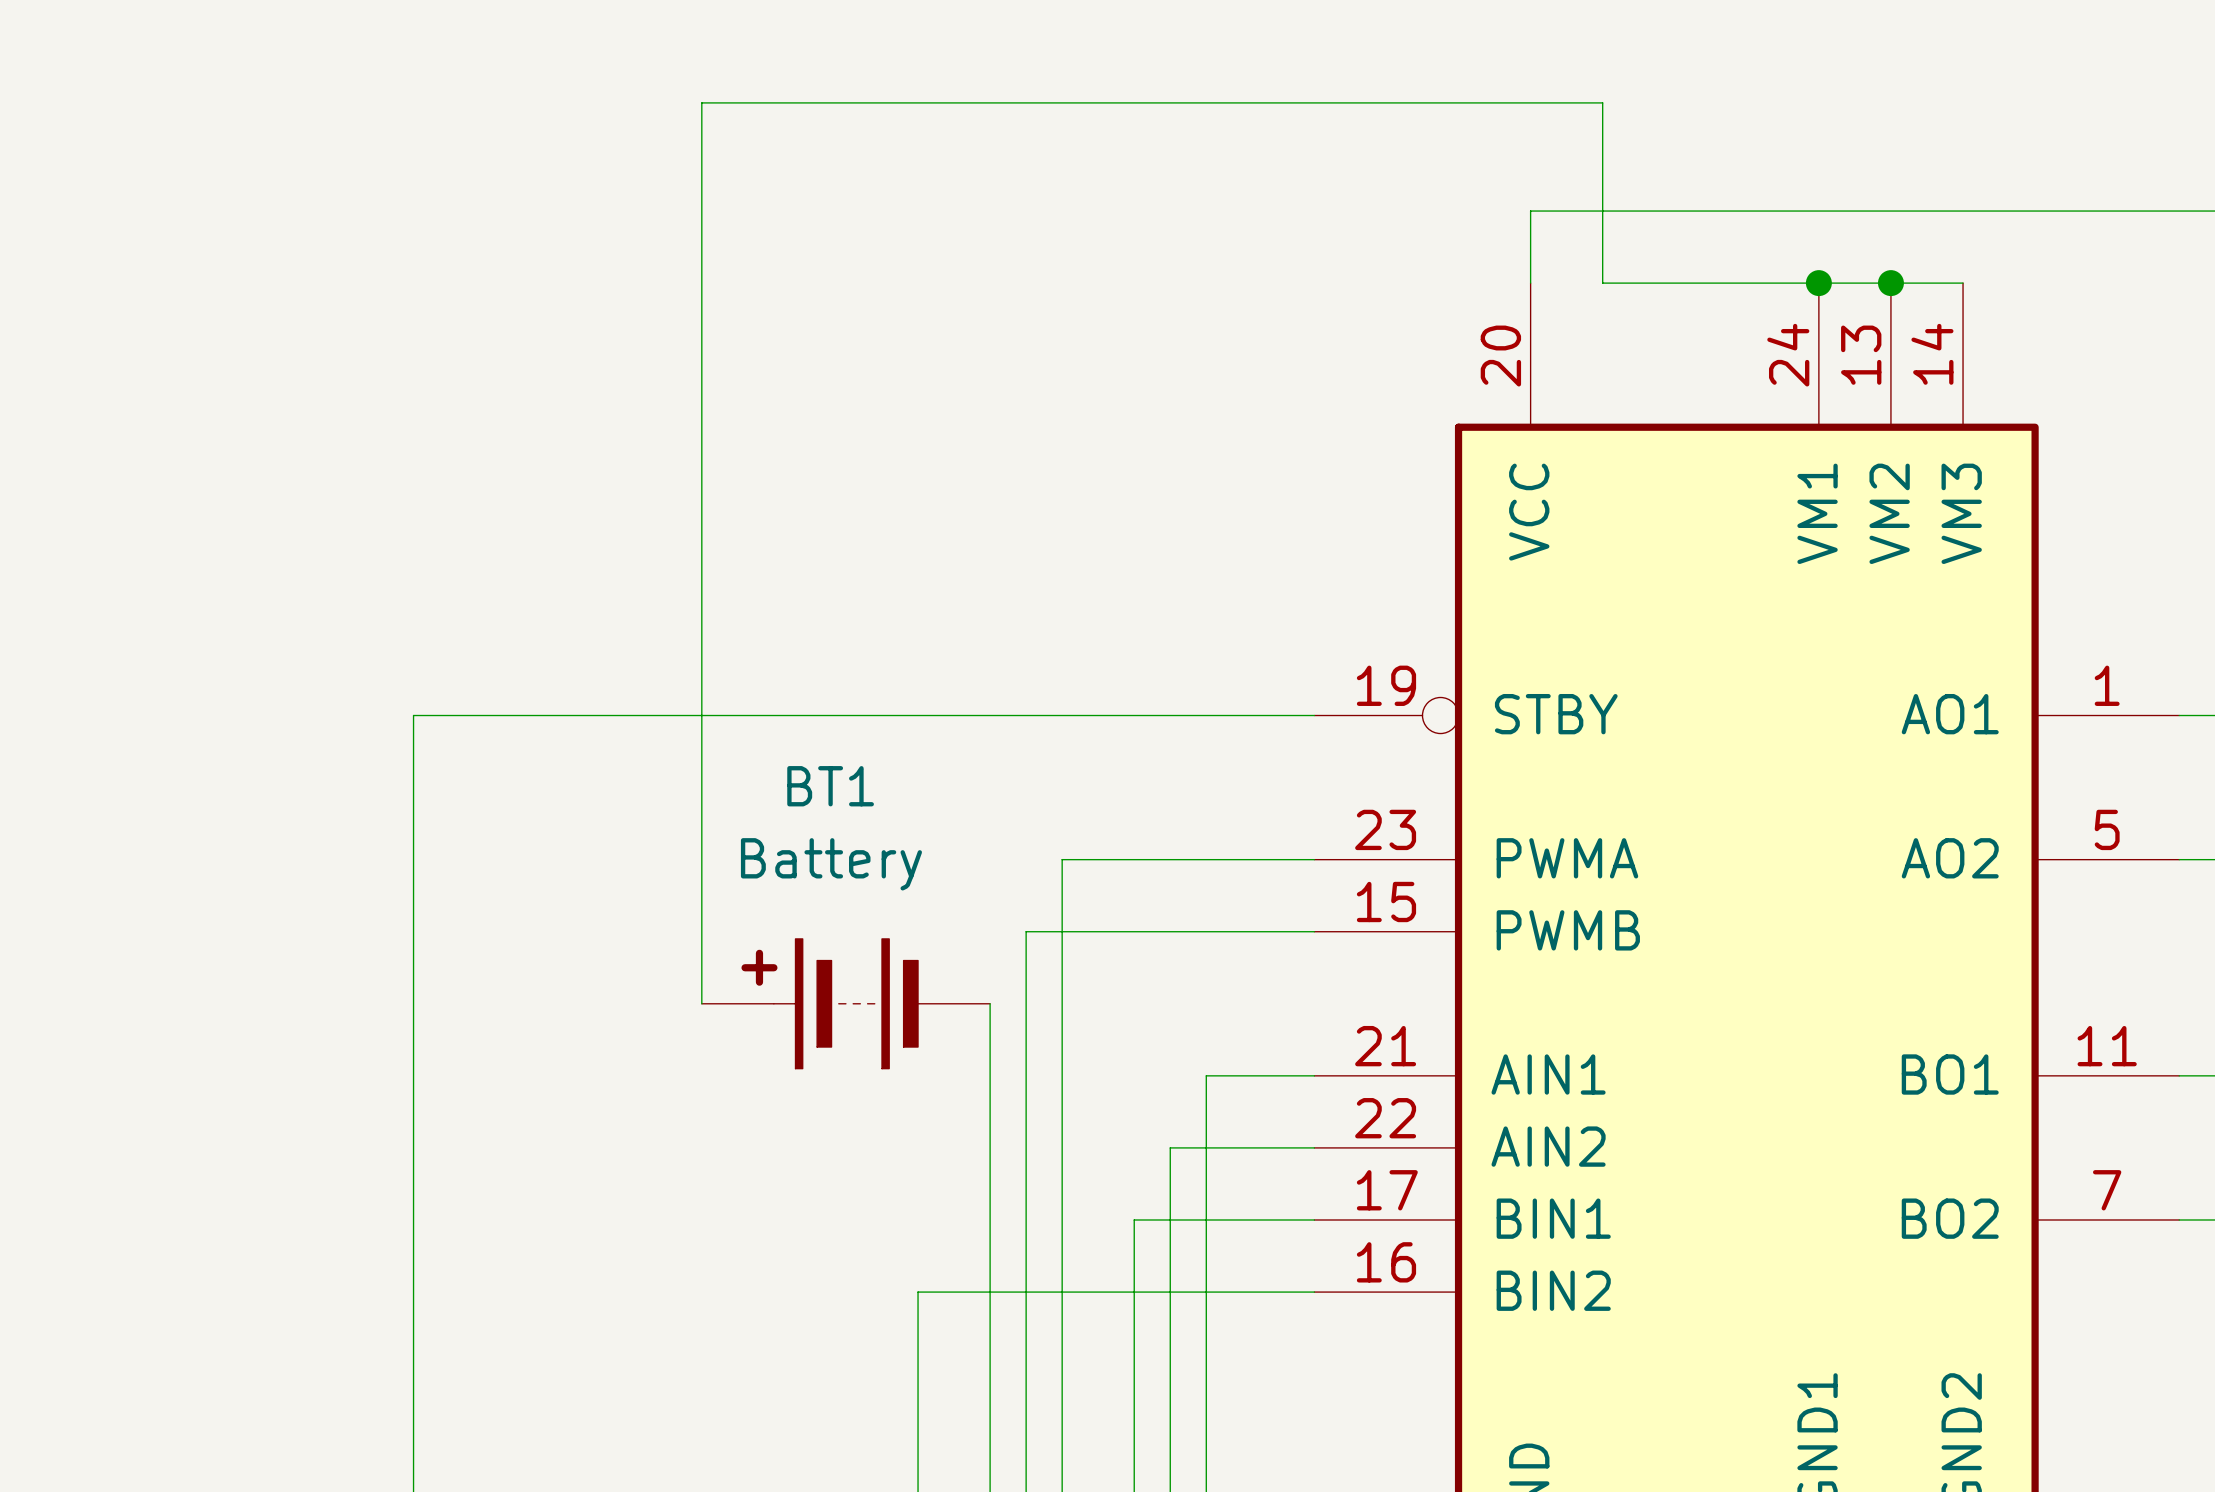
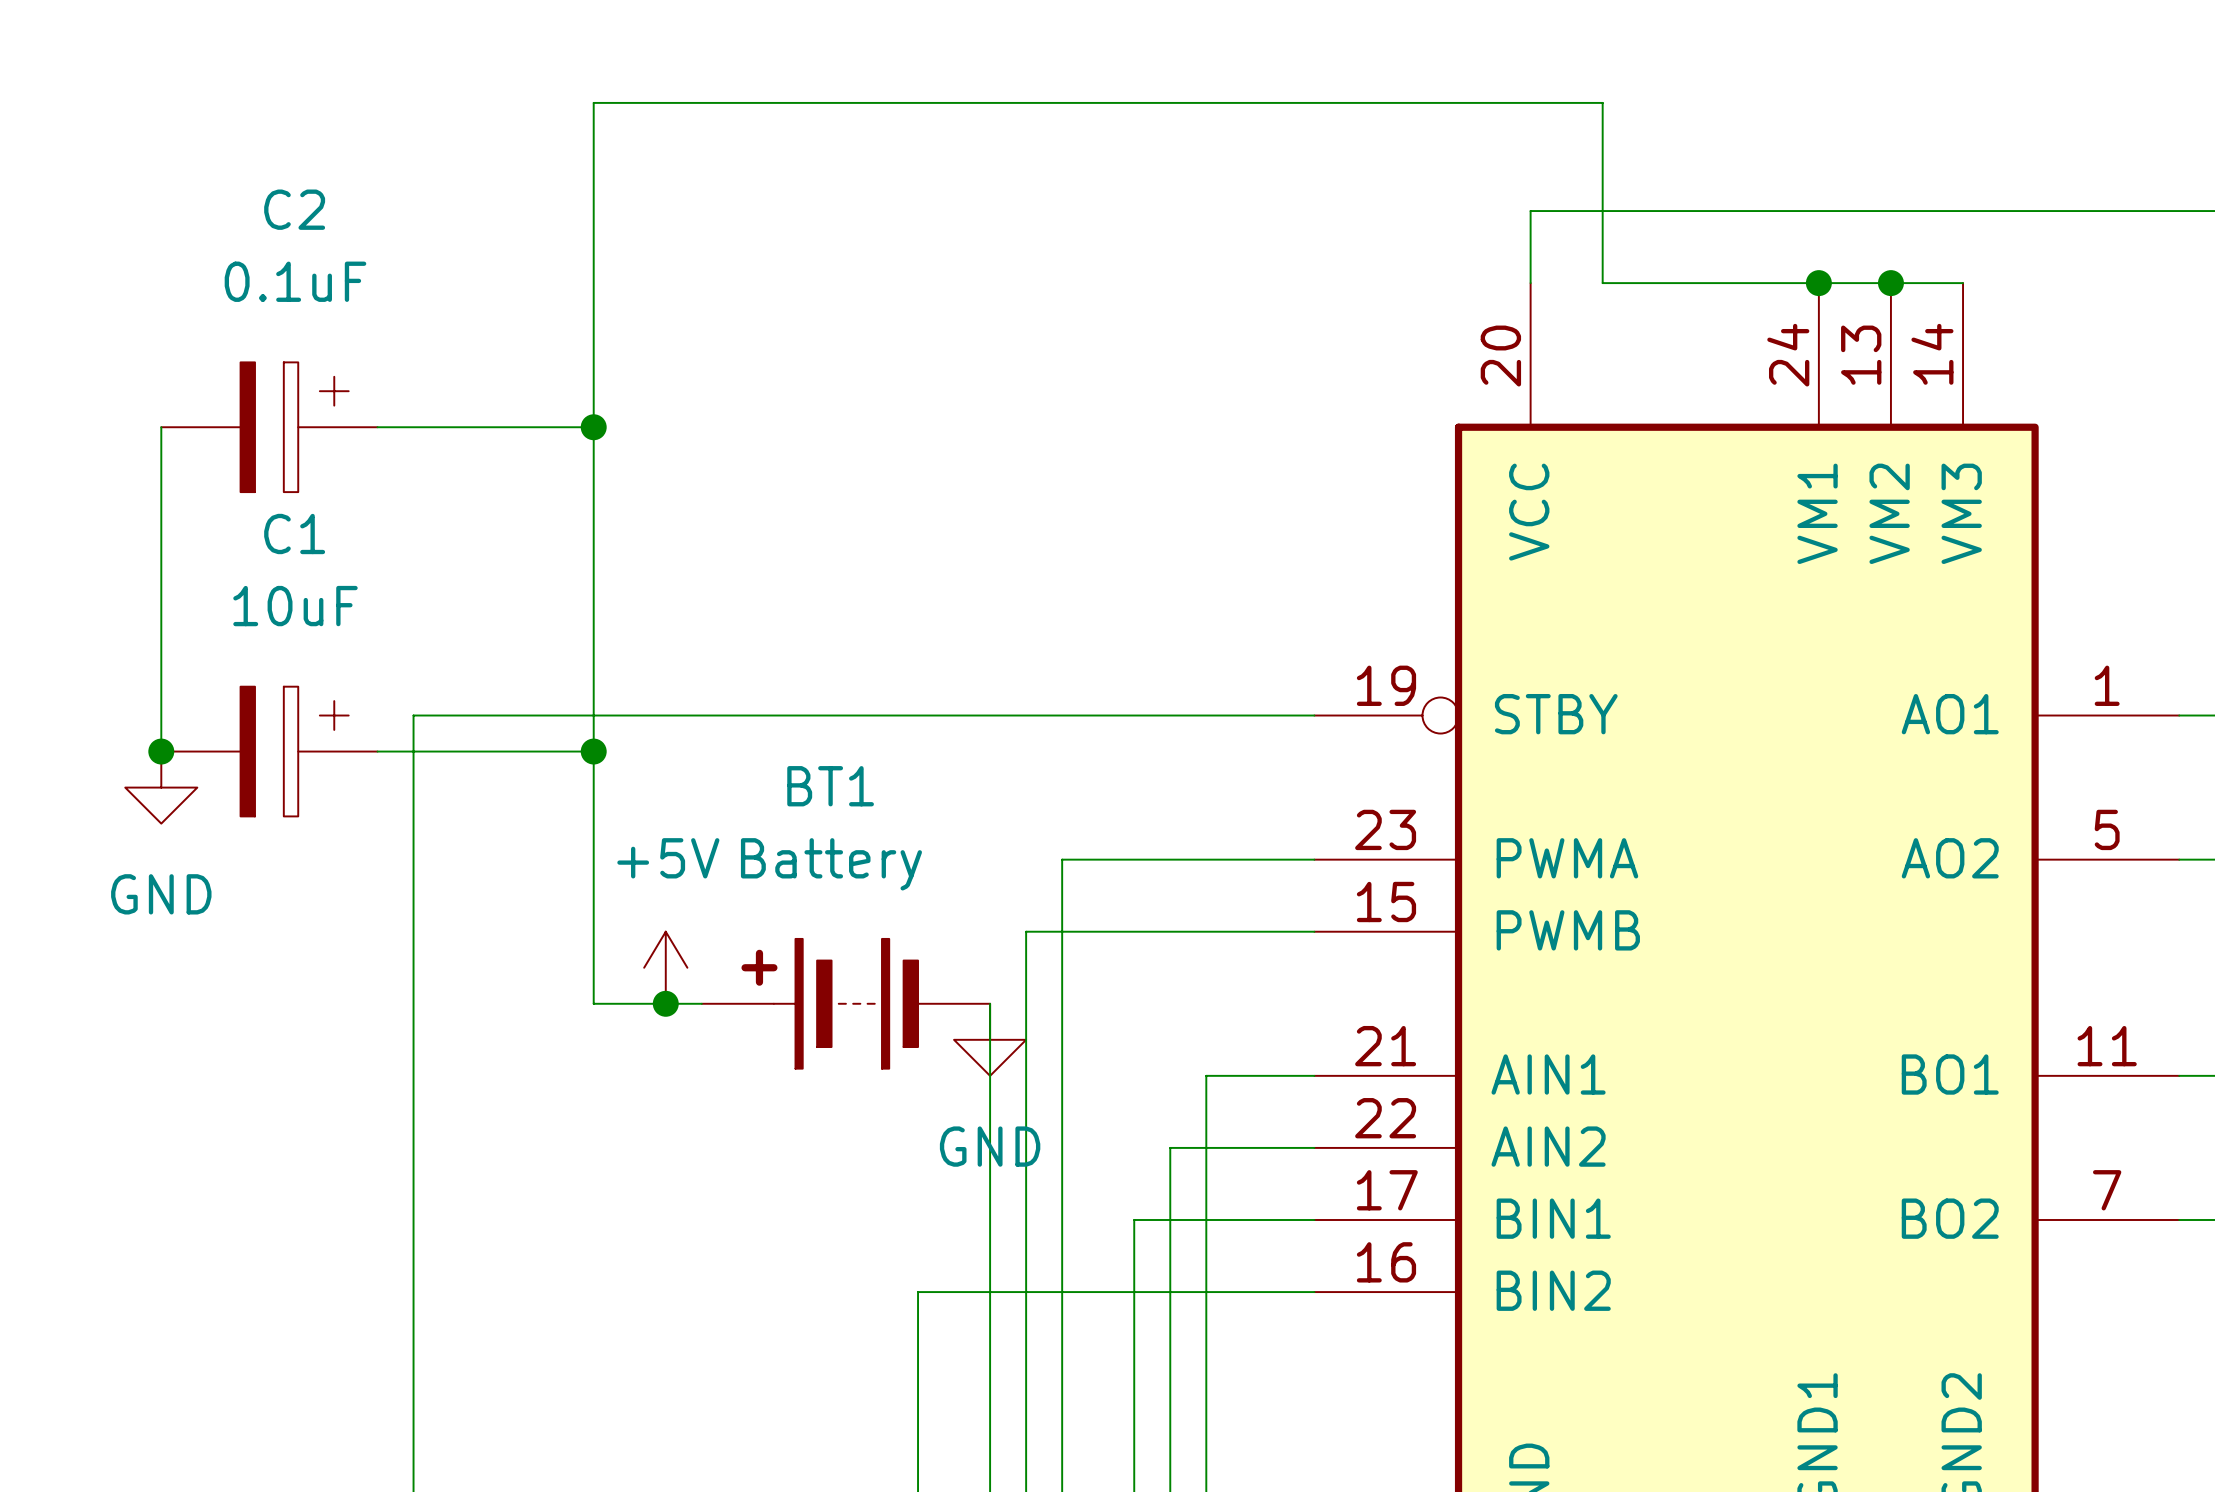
wire: (701, 102) (701, 1003) -> (701, 102) (593, 102) (593, 1003) (701, 1003)
wire: none -> (161, 427) (161, 751)
C2: none -> 0.1uF (269, 427)
wire: none -> (377, 427) (593, 427)
junction: none -> (593, 427)
junction: none -> (161, 751)
C1: none -> 10uF (269, 751)
wire: none -> (377, 751) (593, 751)
junction: none -> (593, 751)
power symbol: none -> GND (161, 787)
power symbol: none -> +5V (665, 967)
junction: none -> (665, 1003)
power symbol: none -> GND (990, 1039)

